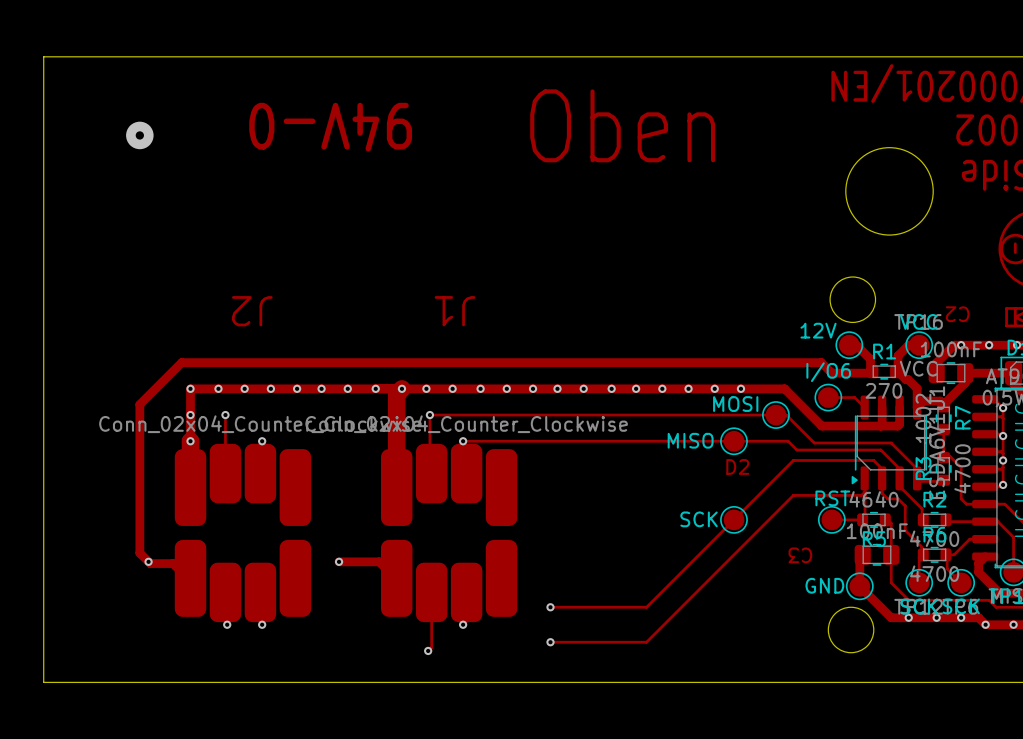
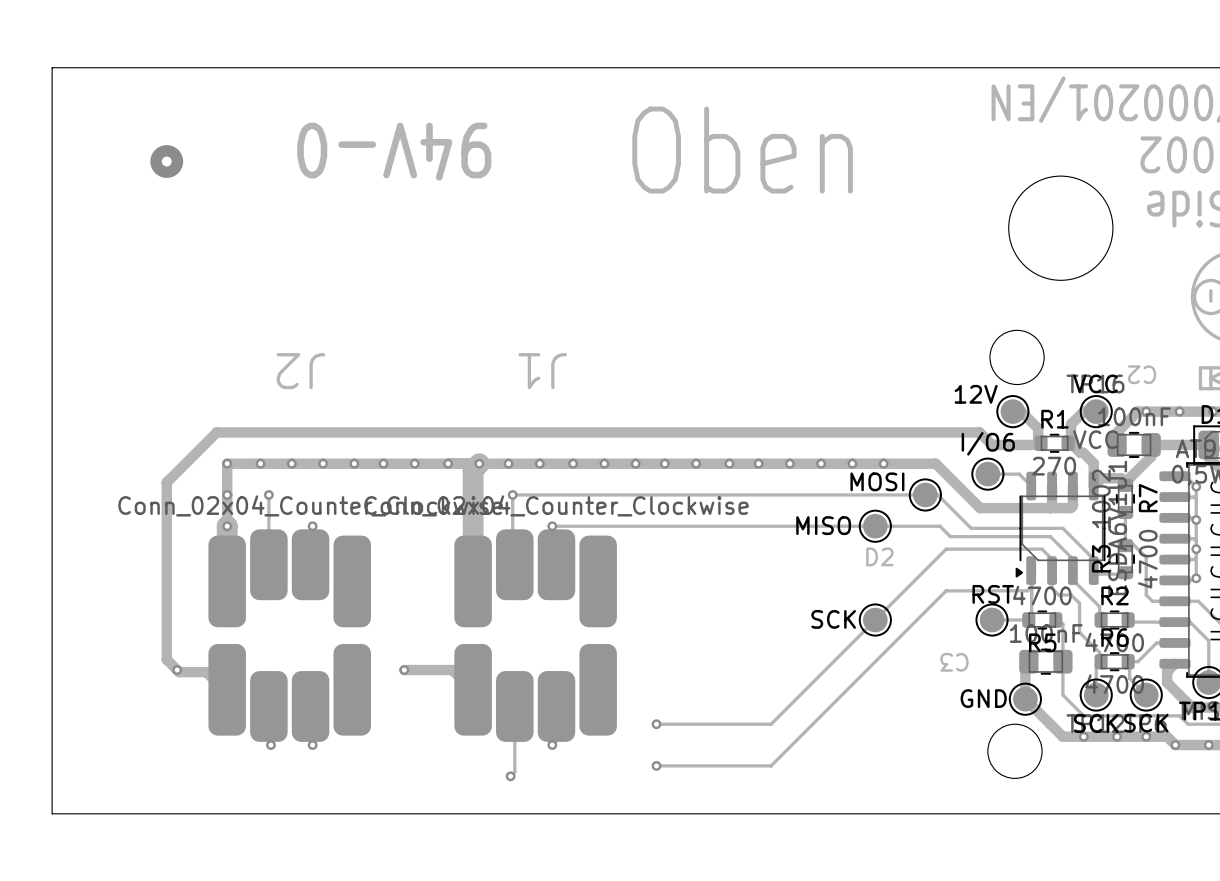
R5 value: 4640 (874, 499) -> 4700 (1042, 595)

